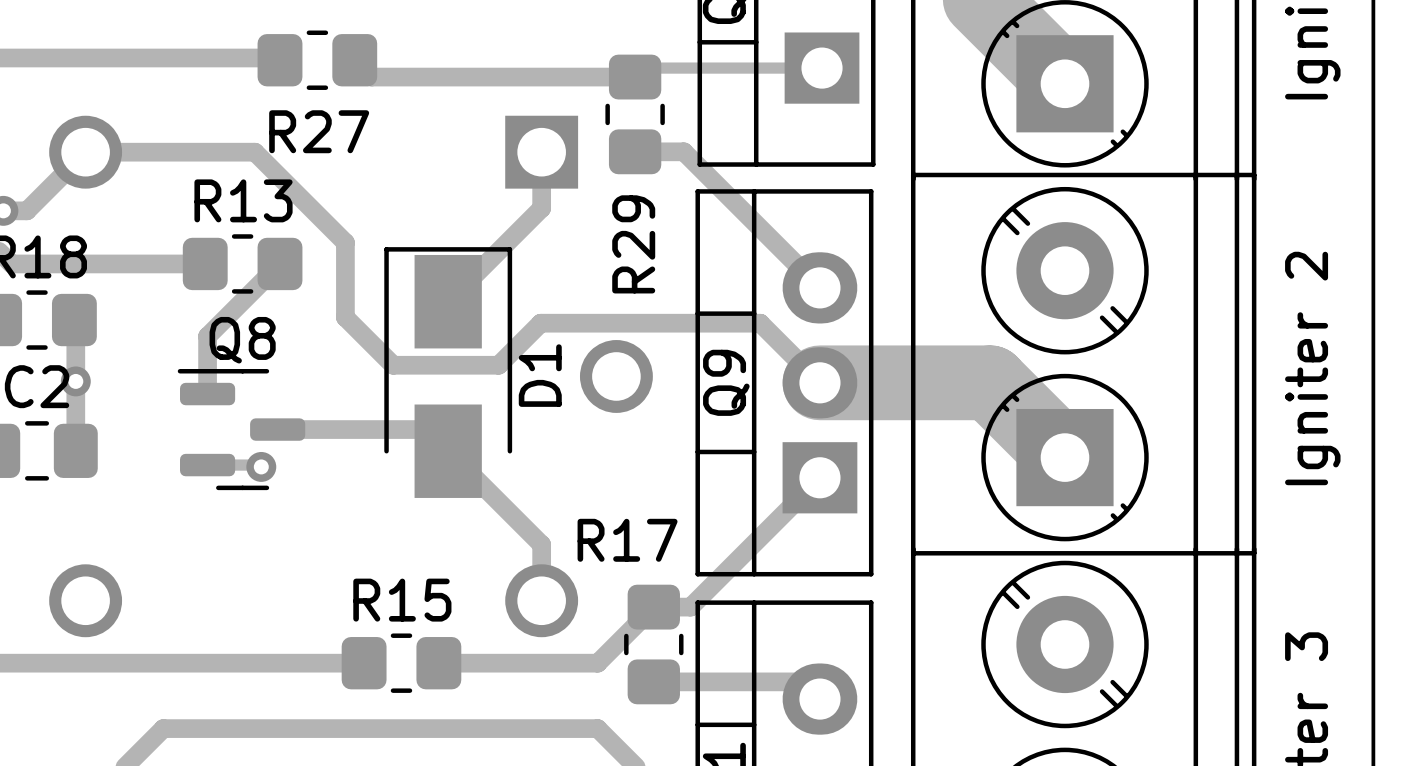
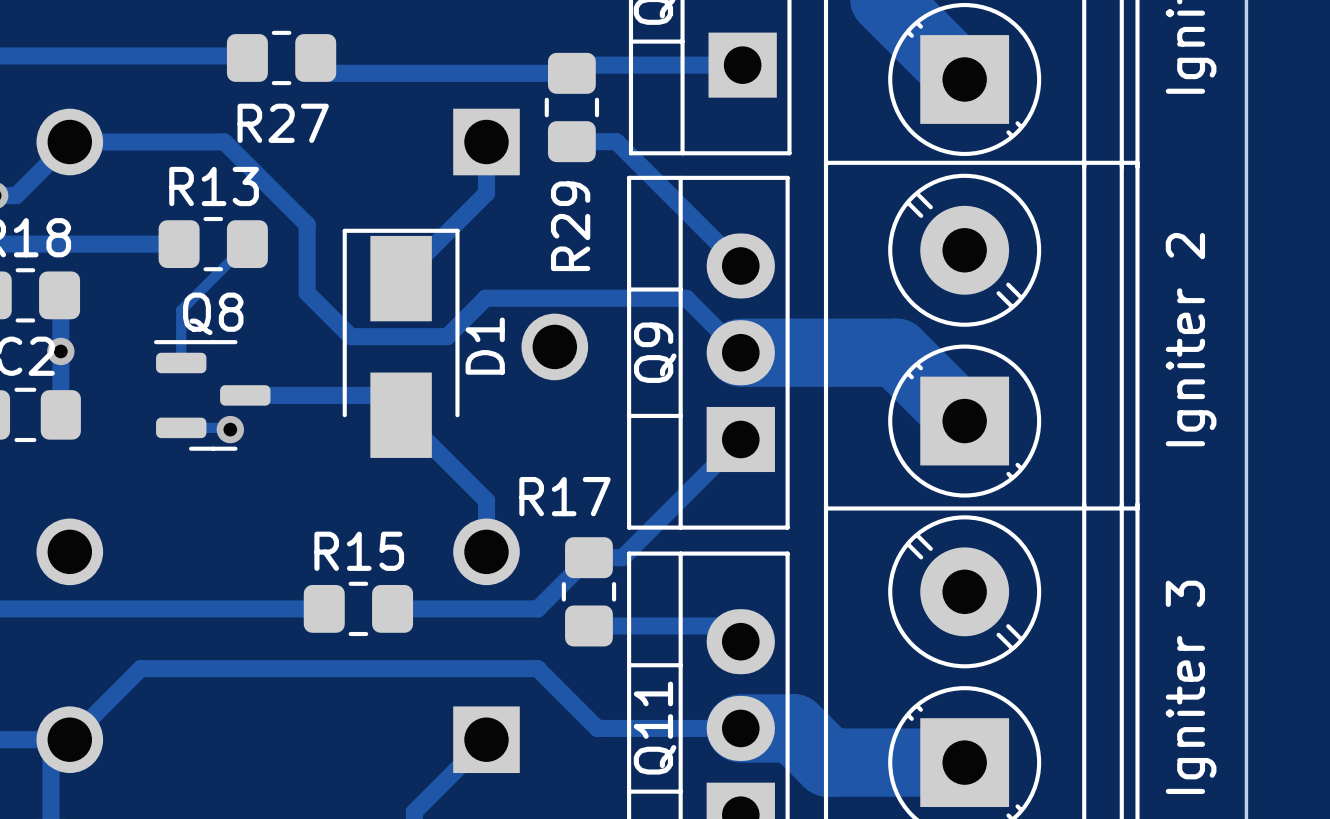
track width: thin (644, 68) (822, 68) -> thick (580, 65) (742, 65)
track width: thick (279, 263) (207, 336) (207, 394) -> thin (247, 244) (181, 310) (181, 362)

